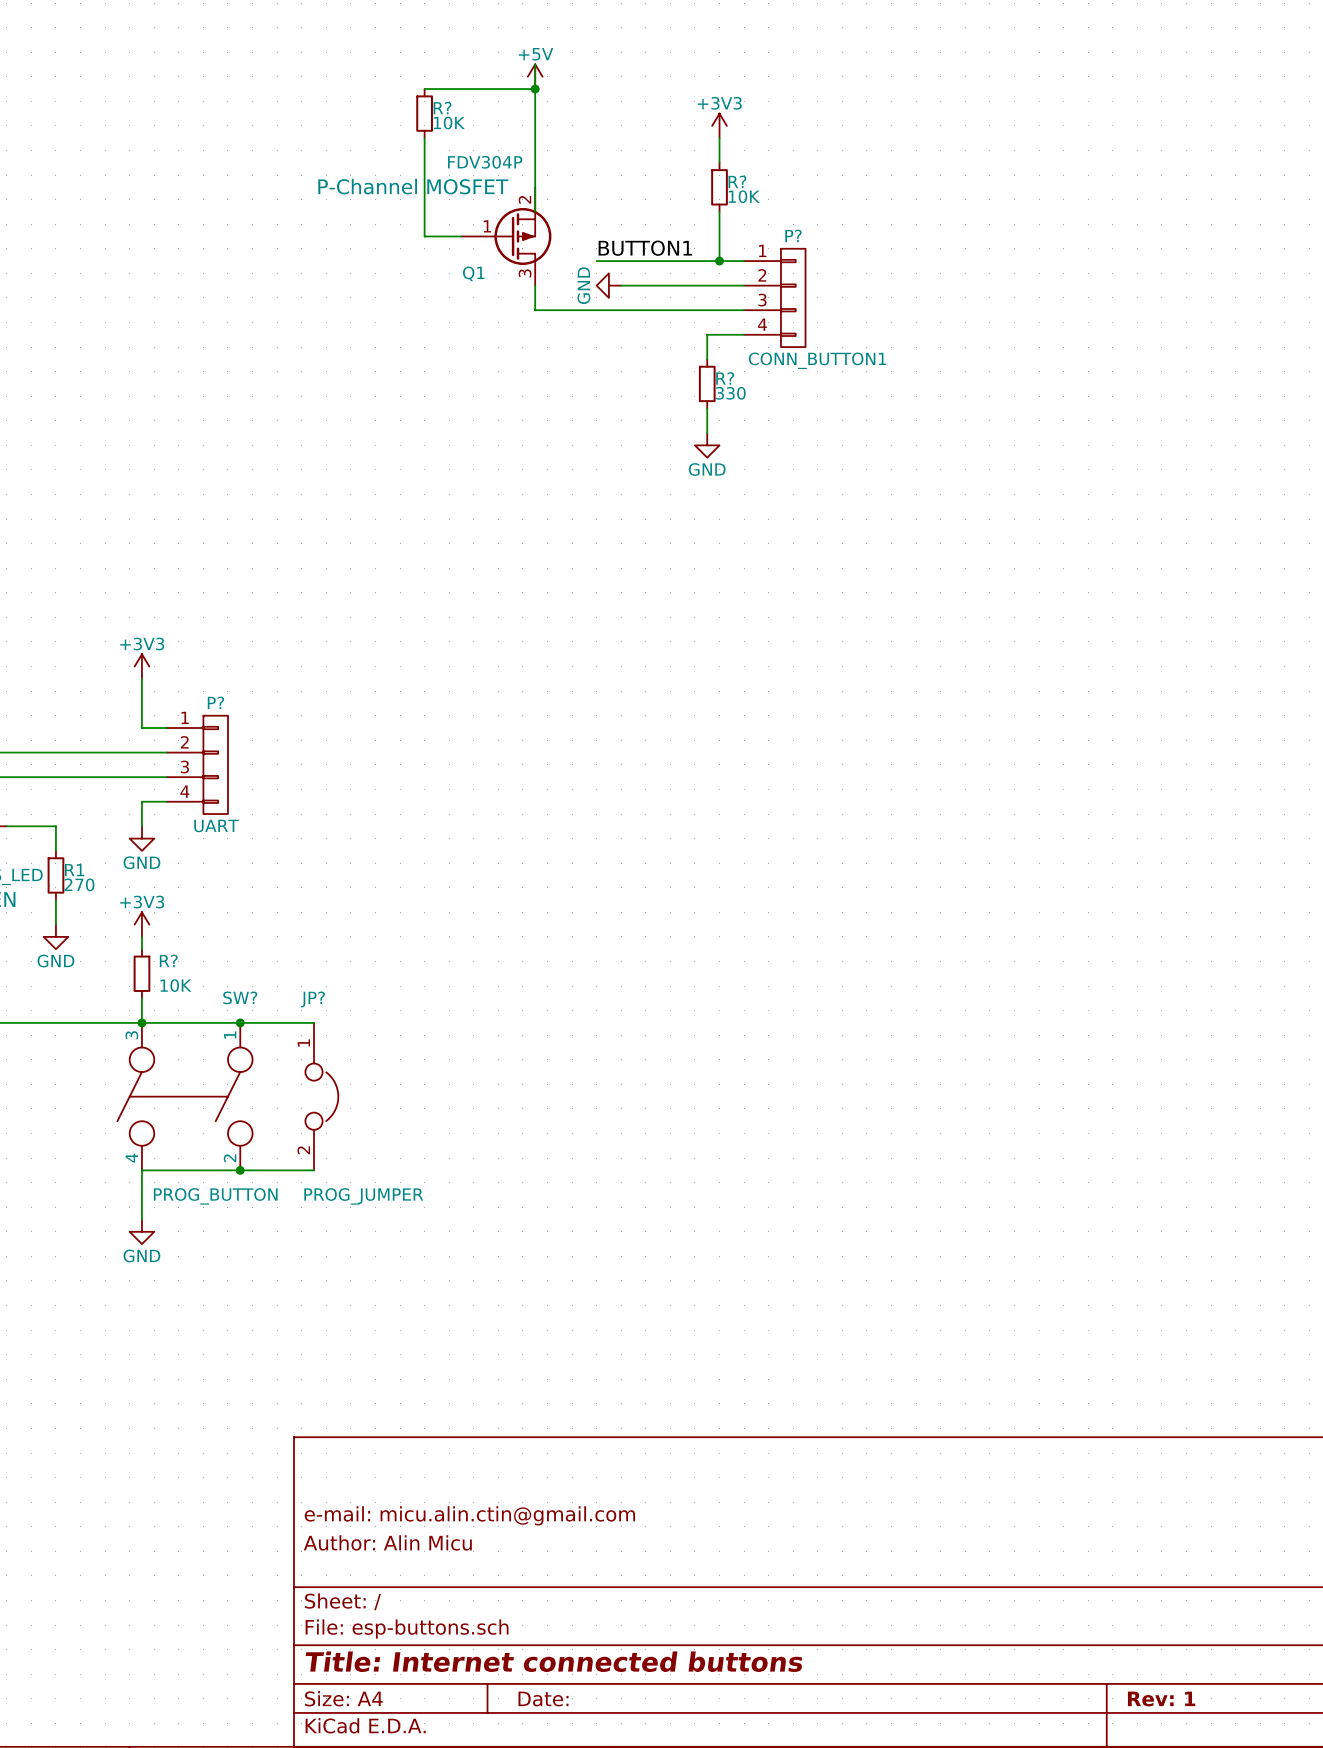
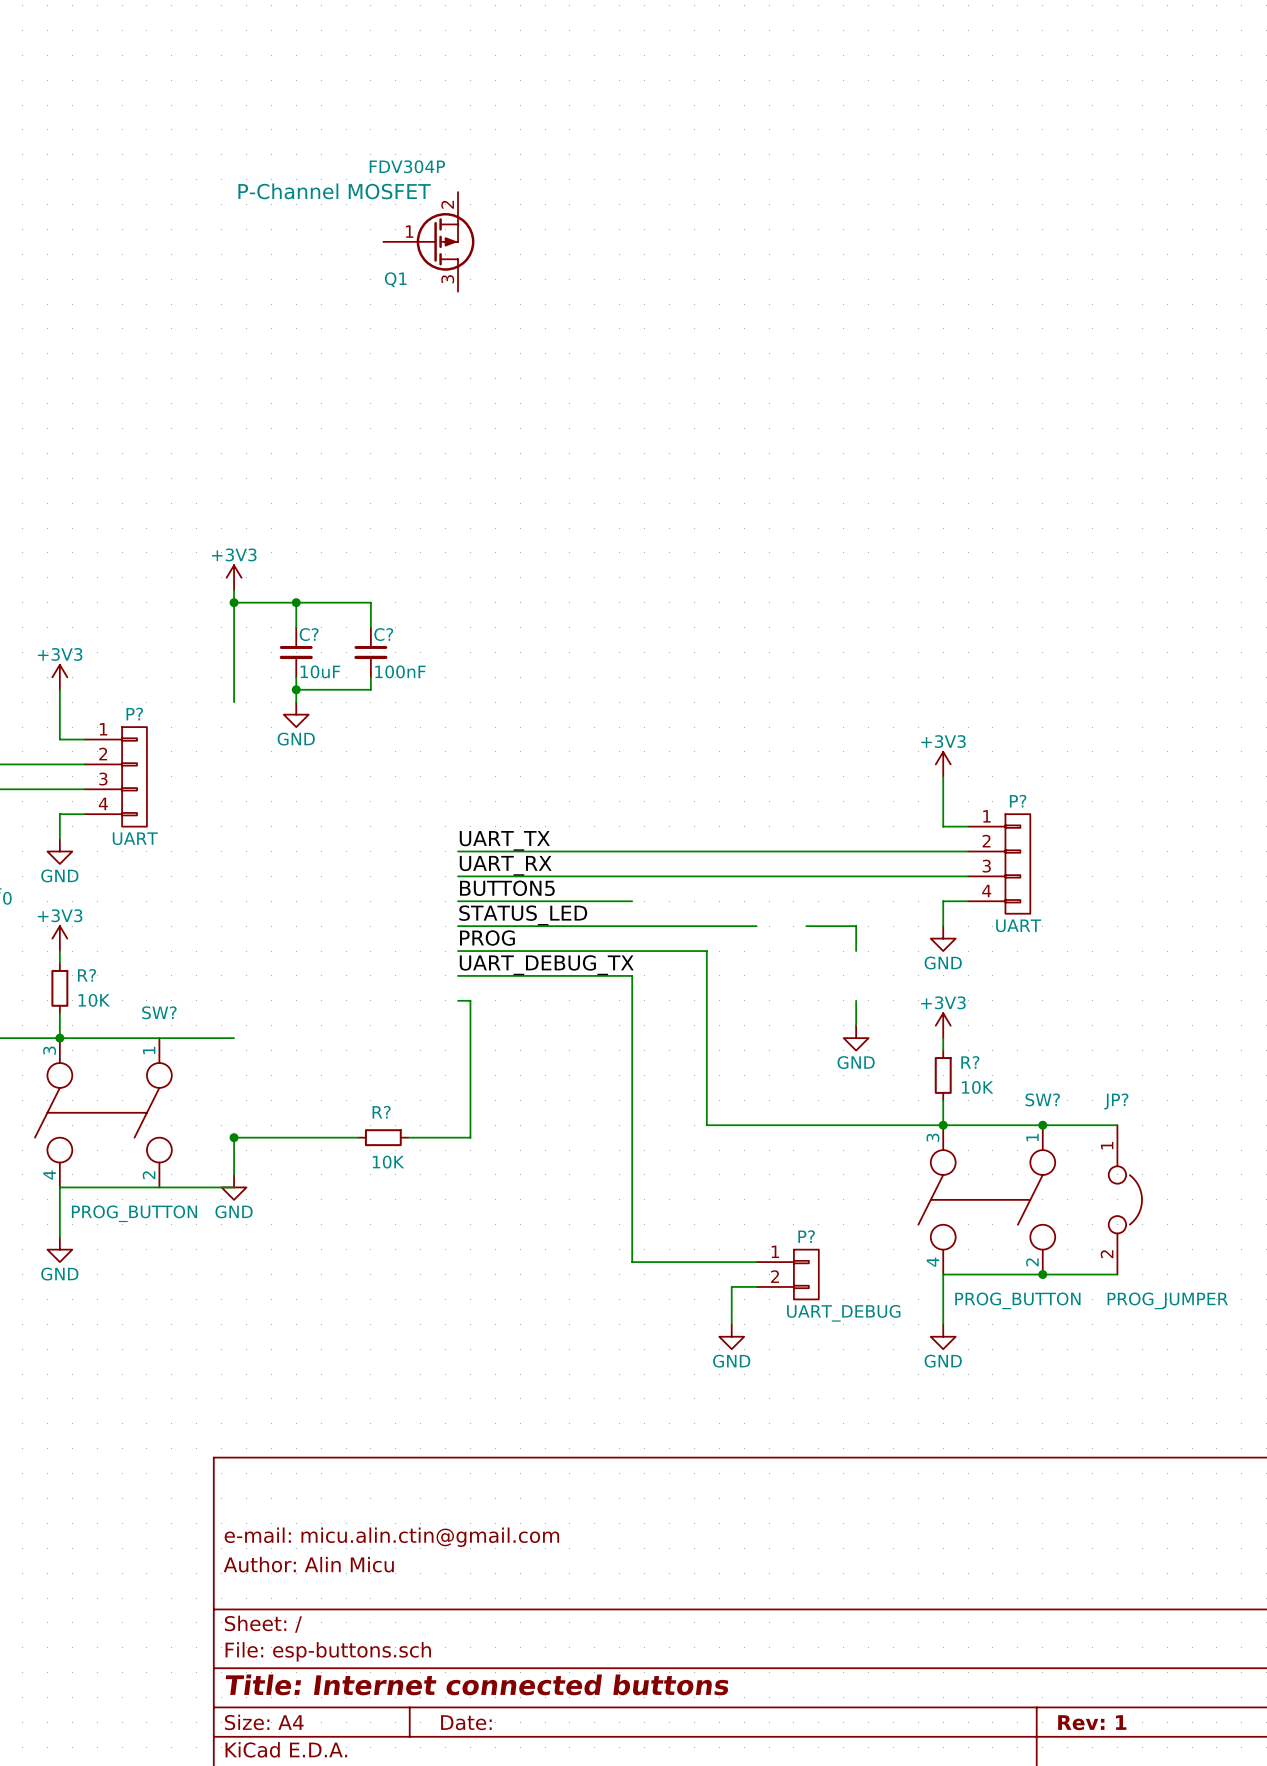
wire: (535, 64) (535, 211) -> none
power symbol: +5V (535, 76) -> none
wire: (424, 89) (535, 89) -> none
junction: (535, 89) -> none
R?: 10K (424, 113) -> none
power symbol: +3V3 (719, 125) -> none
wire: (424, 138) (424, 236) (461, 236) -> none
wire: (719, 138) (719, 162) -> none
R?: 10K (719, 187) -> none
wire: (719, 211) (719, 261) -> none
label: BUTTON1 (645, 248) -> none
wire: (596, 261) (744, 261) -> none
junction: (719, 261) -> none
wire: (535, 285) (535, 310) (744, 310) -> none
power symbol: GND (608, 285) -> none
wire: (621, 285) (744, 285) -> none
P?: CONN_BUTTON1 (774, 297) -> none
wire: (744, 334) (707, 334) (707, 359) -> none
R?: 330 (707, 383) -> none
wire: (707, 408) (707, 433) -> none
power symbol: GND (707, 445) -> none
power symbol: none -> +3V3 (234, 577)
wire: none -> (234, 590) (234, 702)
wire: none -> (234, 602) (370, 602) (370, 627)
junction: none -> (234, 602)
wire: none -> (296, 602) (296, 627)
junction: none -> (296, 602)
C?: none -> 10uF (296, 652)
C?: none -> 100nF (370, 652)
wire: none -> (296, 677) (296, 702)
wire: none -> (370, 677) (370, 689) (296, 689)
junction: none -> (296, 689)
power symbol: none -> GND (296, 714)
power symbol: none -> +3V3 (943, 764)
wire: none -> (943, 776) (943, 826) (968, 826)
label: none -> UART_TX (504, 840)
wire: none -> (458, 851) (968, 851)
P?: none -> UART (999, 863)
label: none -> UART_RX (505, 865)
wire: none -> (458, 876) (968, 876)
label: none -> BUTTON5 (507, 888)
wire: none -> (458, 901) (632, 901)
wire: none -> (968, 901) (943, 901) (943, 926)
label: none -> STATUS_LED (523, 915)
wire: none -> (458, 926) (756, 926)
wire: none -> (806, 926) (856, 926) (856, 951)
label: none -> PROG (487, 938)
power symbol: none -> GND (943, 938)
wire: none -> (458, 951) (706, 951) (706, 1125) (1117, 1125)
label: none -> UART_DEBUG_TX (546, 965)
wire: none -> (458, 975) (632, 975) (632, 1262) (756, 1262)
wire: none -> (458, 1000) (470, 1000) (470, 1137) (408, 1137)
wire: none -> (856, 1000) (856, 1025)
power symbol: none -> +3V3 (943, 1025)
junction: (240, 1022) -> none
power symbol: none -> GND (856, 1038)
wire: none -> (943, 1038) (943, 1050)
R?: none -> 10K (943, 1075)
wire: none -> (943, 1100) (943, 1125)
JP?: PROG_JUMPER (321, 1096) -> none
junction: none -> (943, 1125)
junction: none -> (1042, 1125)
junction: none -> (234, 1137)
wire: none -> (358, 1137) (234, 1137) (234, 1174)
R?: none -> 10K (383, 1137)
junction: (240, 1170) -> none
power symbol: none -> GND (234, 1187)
SW?: none -> PROG_BUTTON (986, 1199)
JP?: none -> PROG_JUMPER (1125, 1199)
P?: none -> UART_DEBUG (787, 1274)
junction: none -> (1042, 1274)
wire: none -> (1117, 1274) (943, 1274) (943, 1324)
wire: none -> (756, 1286) (731, 1286) (731, 1324)
power symbol: none -> GND (731, 1336)
power symbol: none -> GND (943, 1336)

